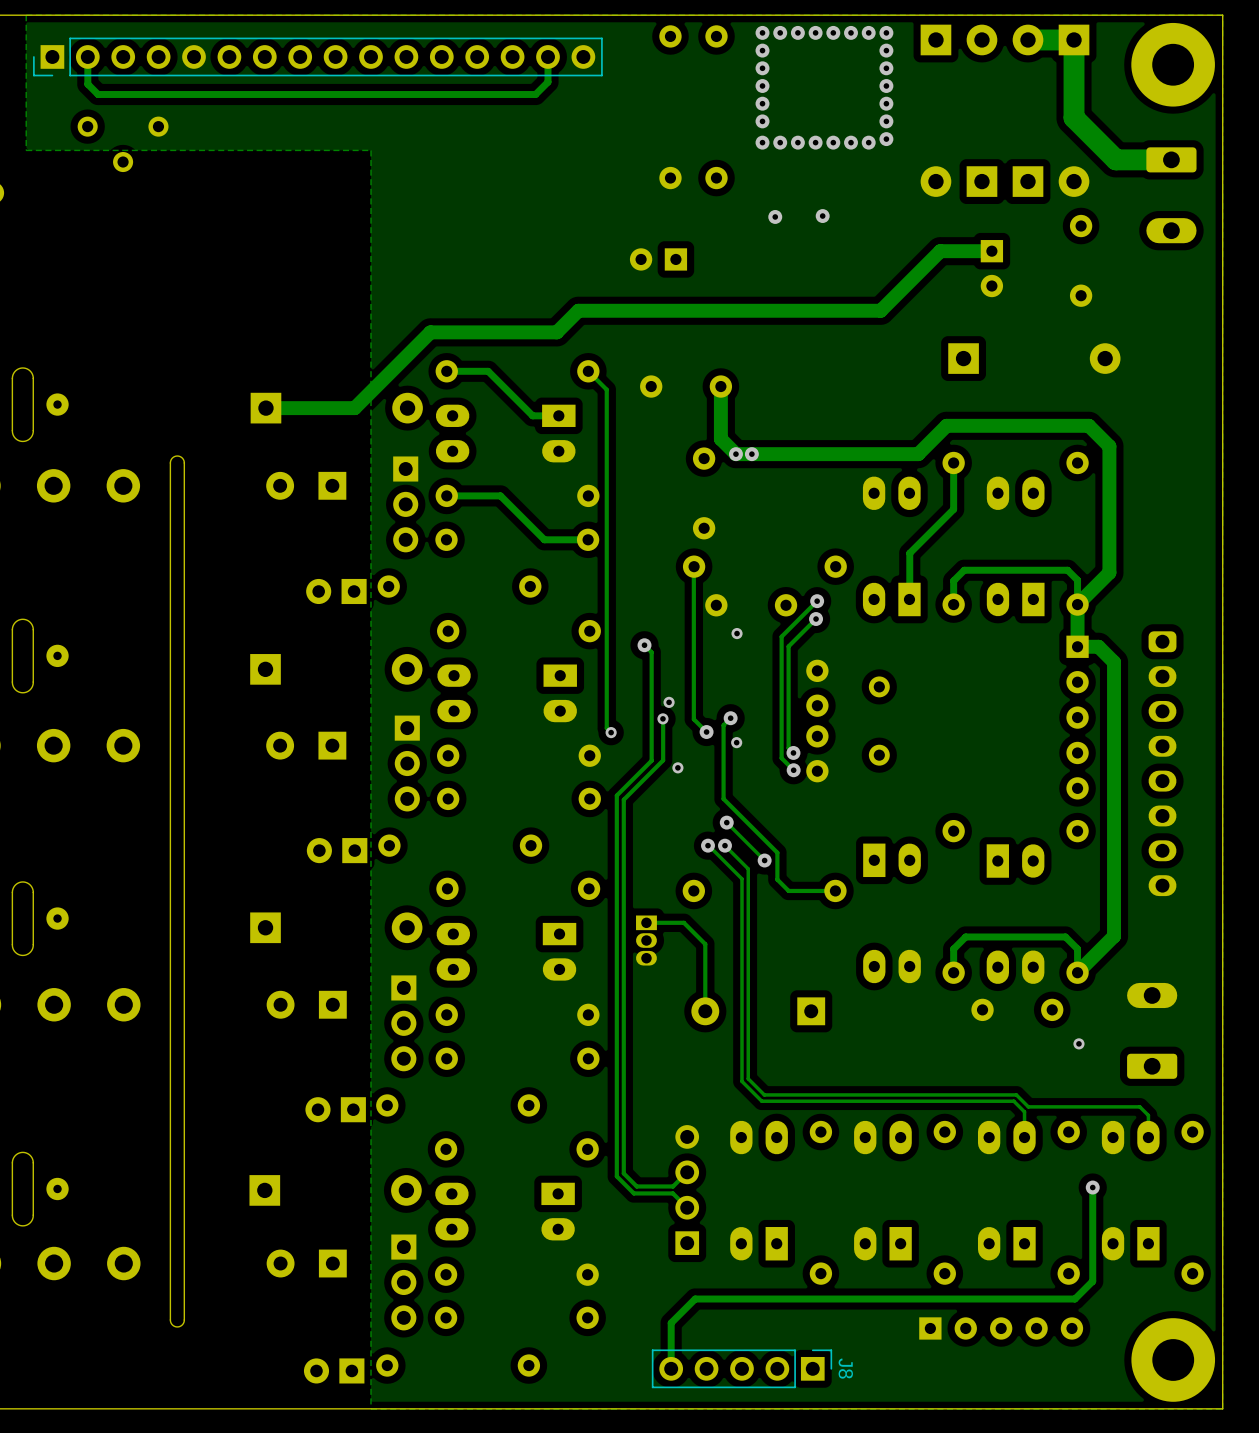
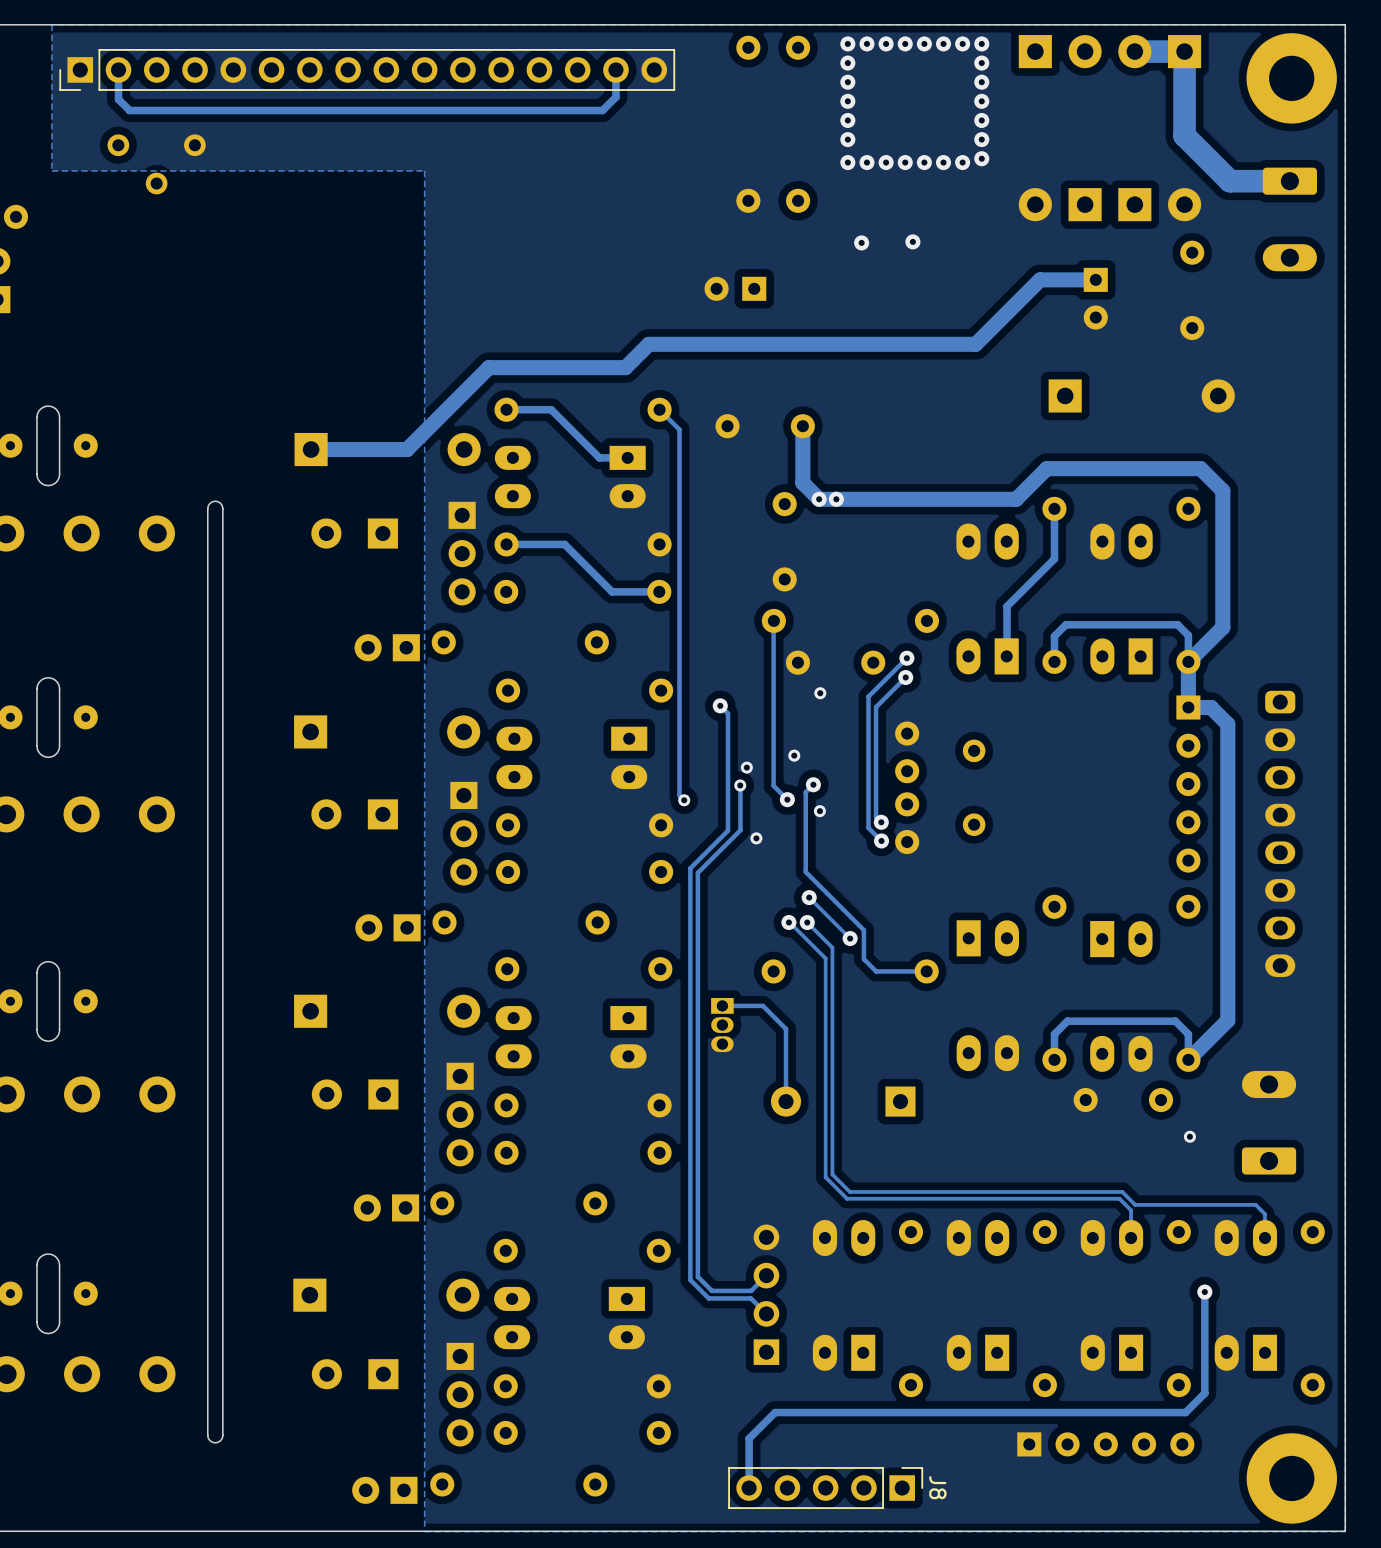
via: none -> (794, 755)

